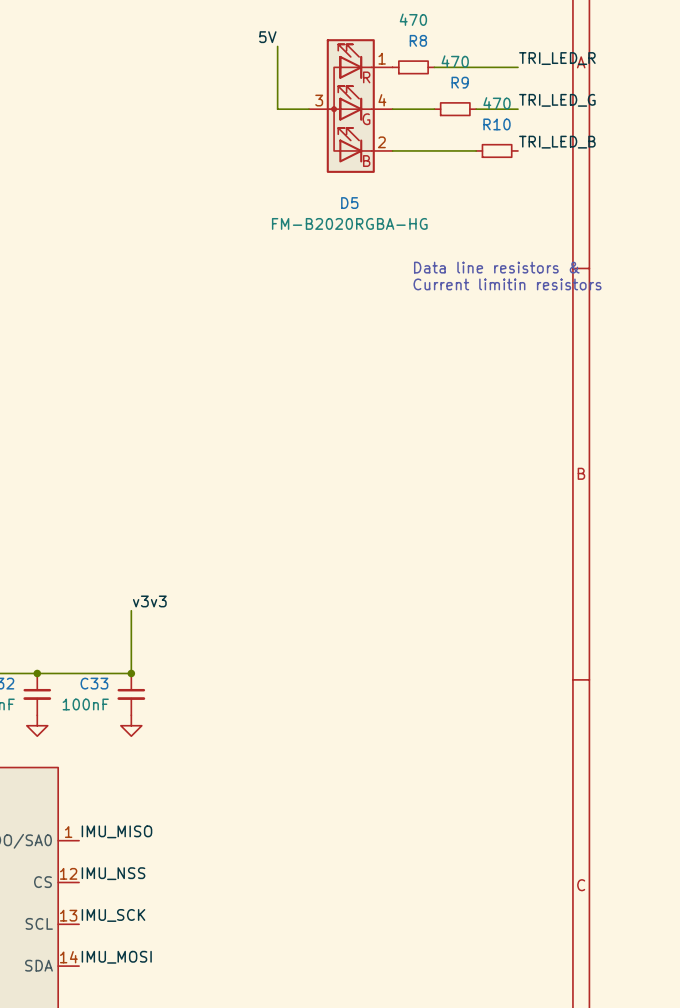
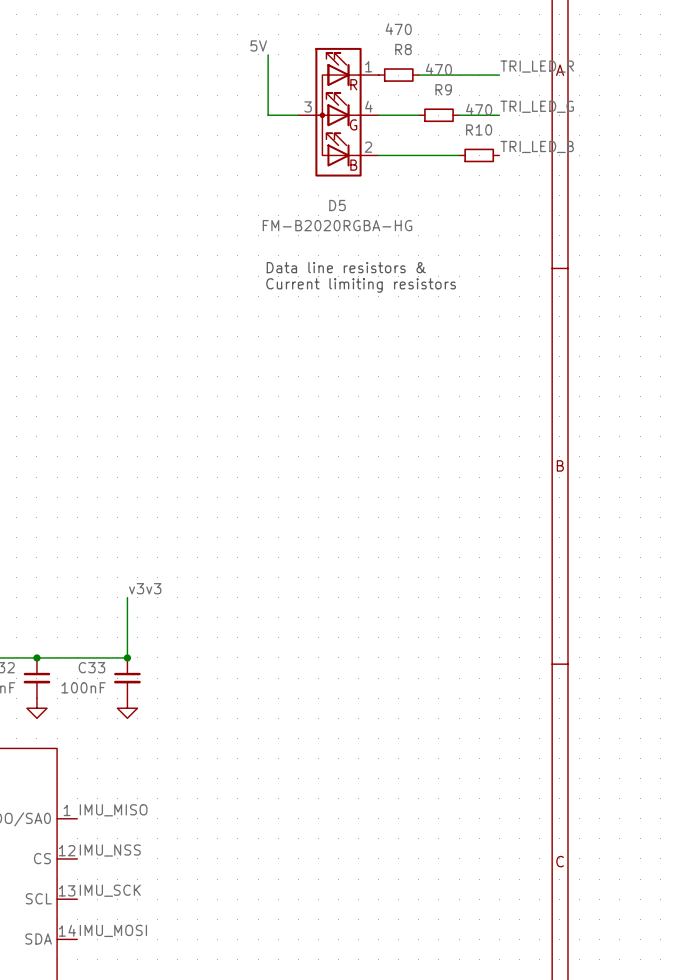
text position: Data line resistors & (496, 267) -> Data line resistors & (346, 267)
text: Current limitin resistors (507, 284) -> Current limiting resistors (361, 285)

